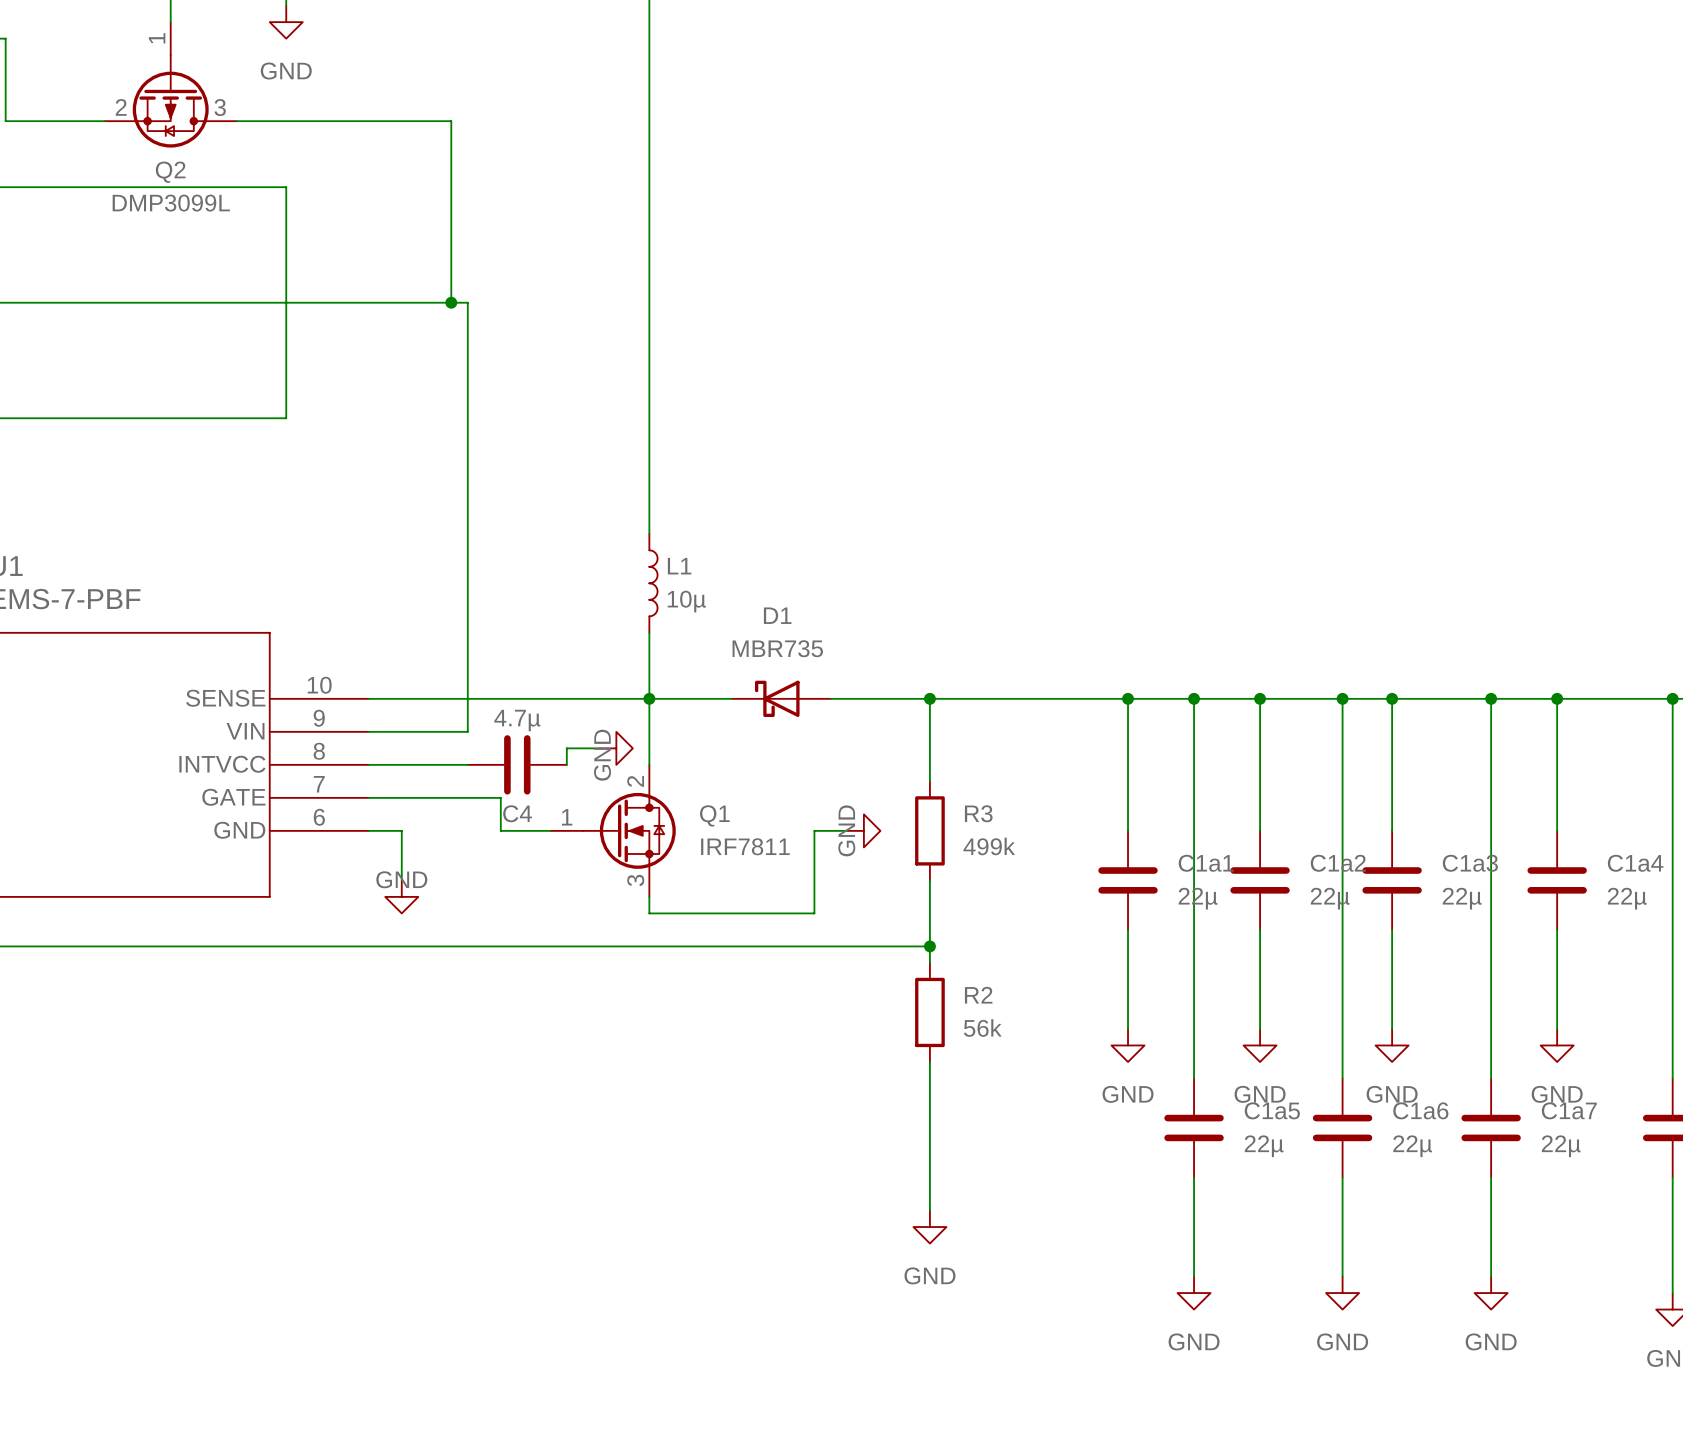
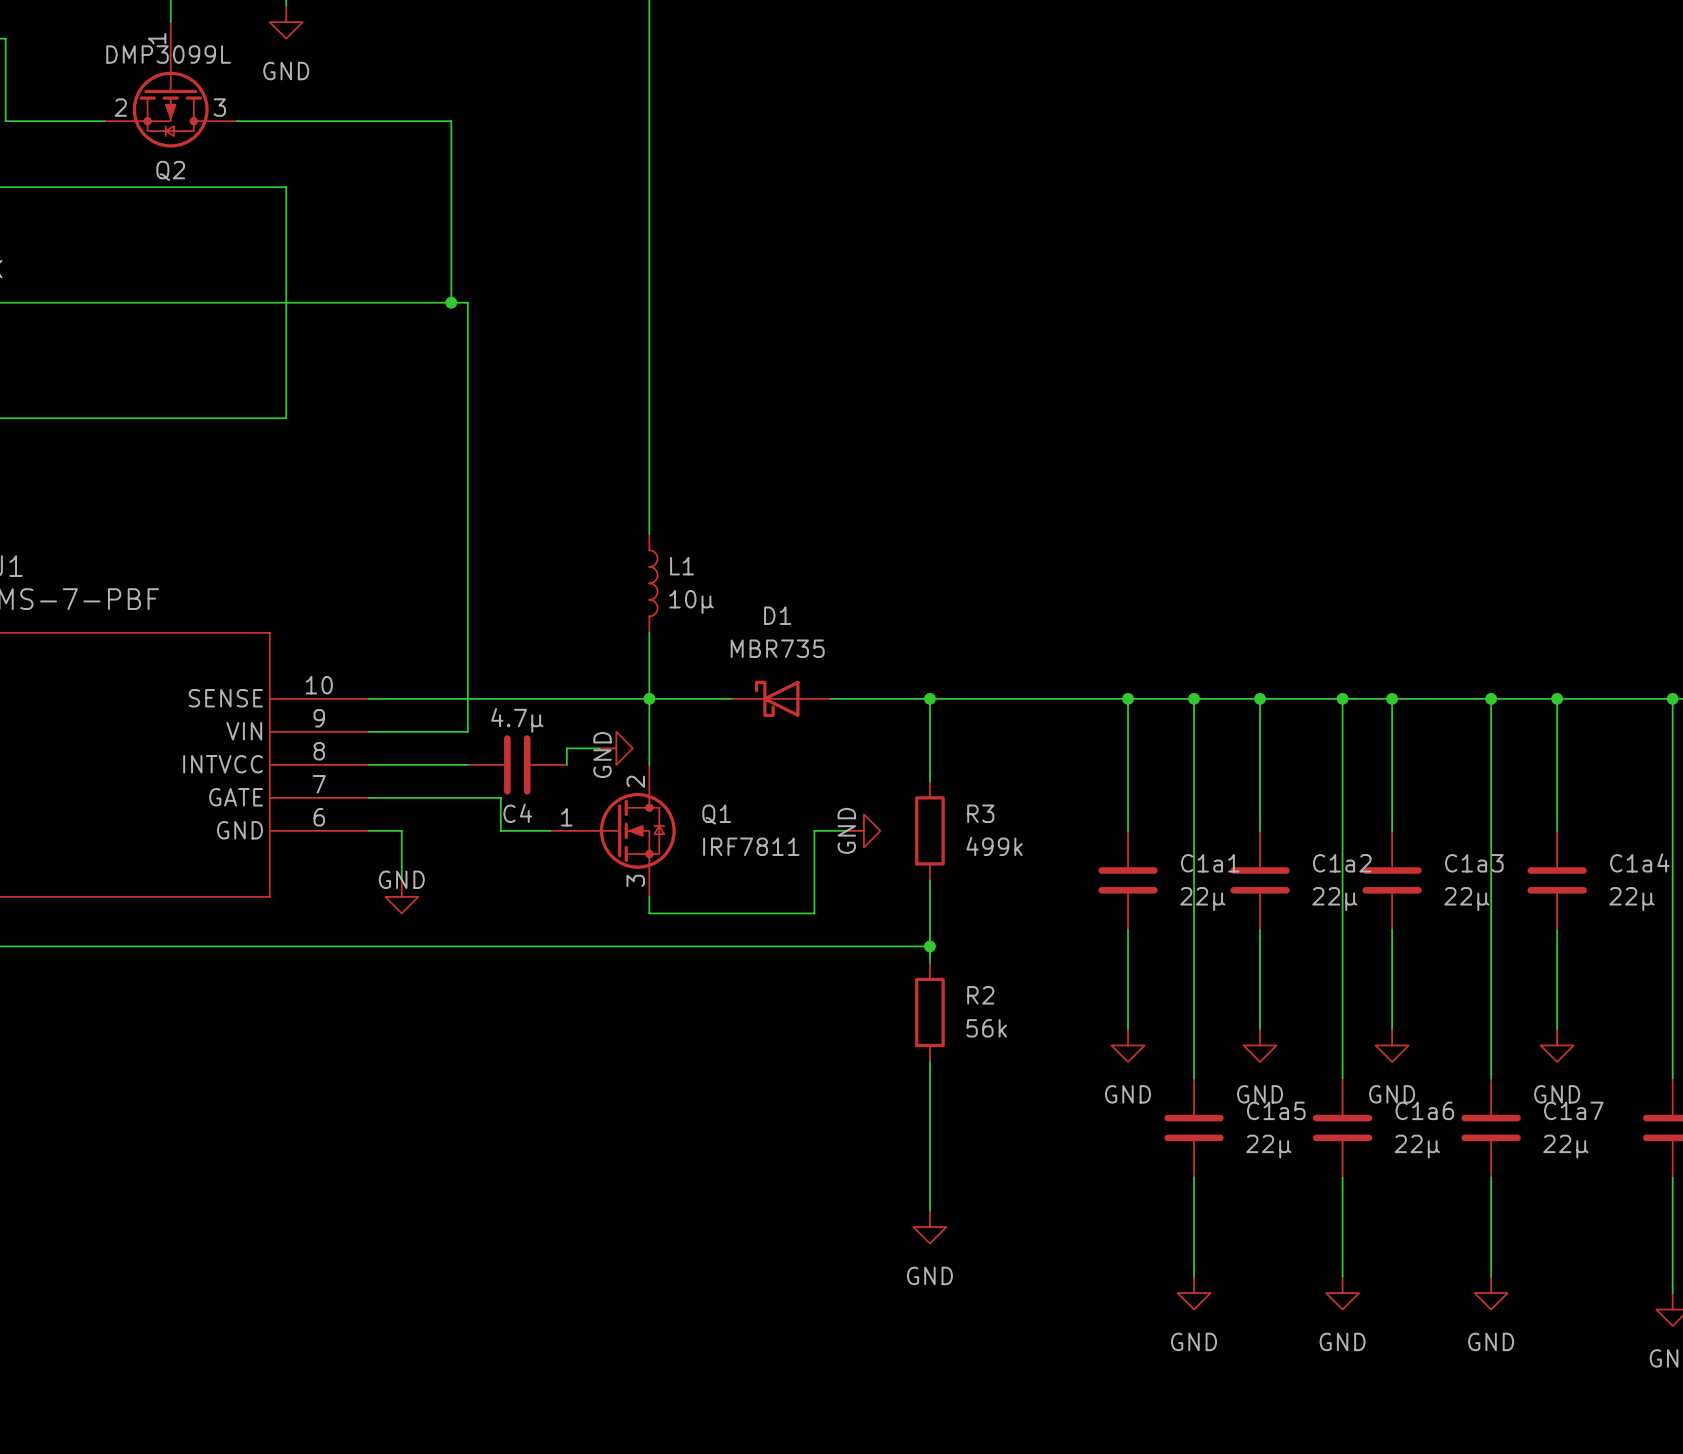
Q2 value position: DMP3099L (171, 203) -> DMP3099L (168, 54)

